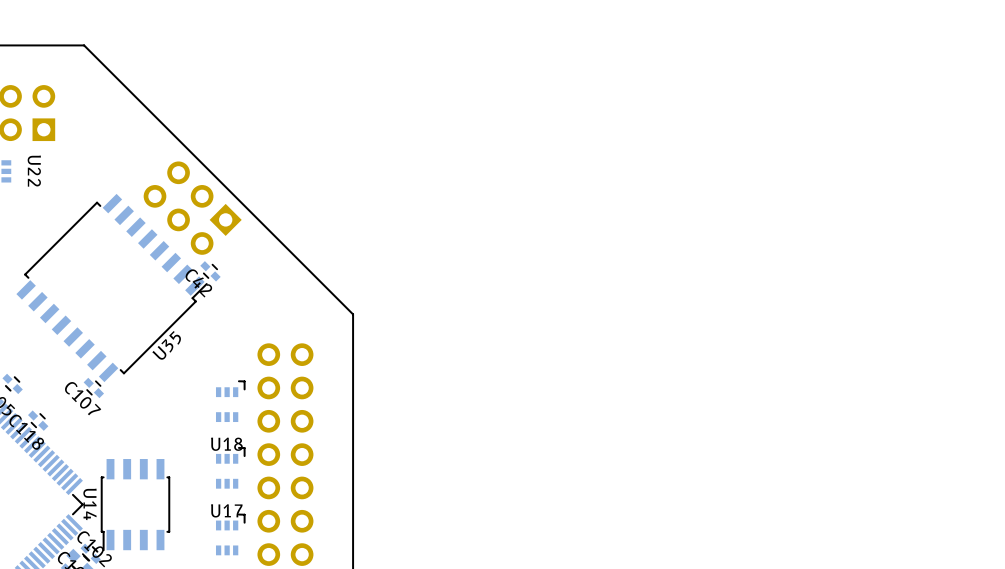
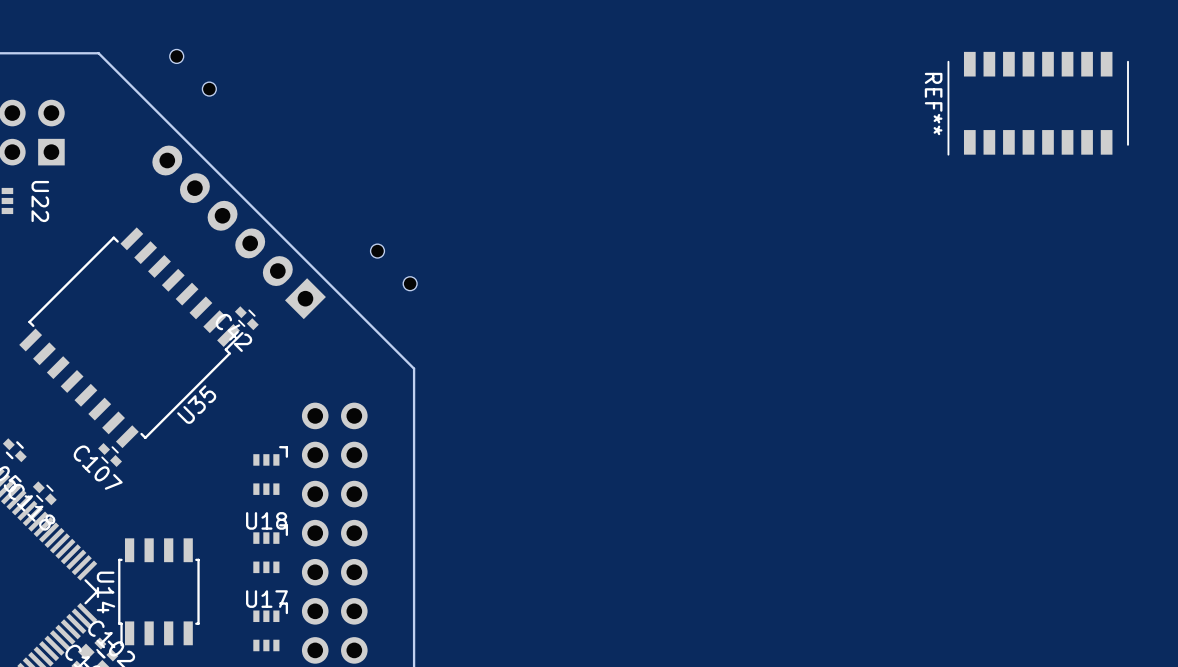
part: none -> (193, 72)
REF**: none -> (1038, 103)
part: none -> (239, 232)
part: (192, 208) -> none
part: none -> (393, 267)

